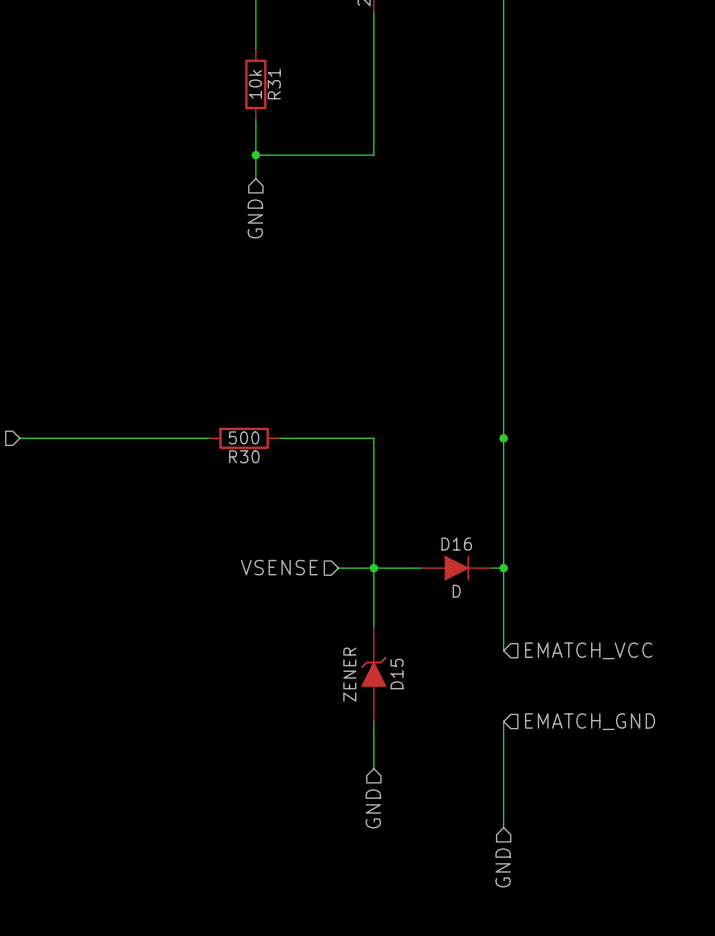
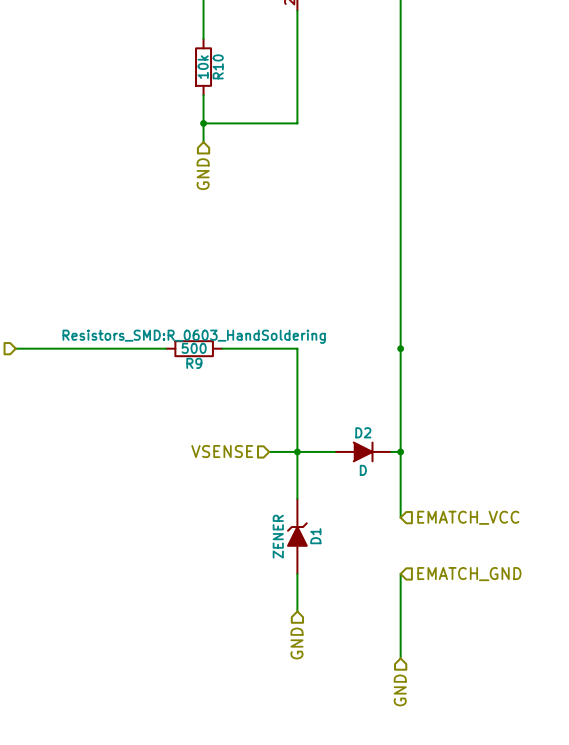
R31 name: R31 (274, 84) -> R10 (218, 66)
R30 text: none -> Resistors_SMD:R_0603_HandSoldering (194, 336)
R30 name: R30 (244, 456) -> R9 (194, 363)
D16 name: D16 (456, 544) -> D2 (363, 432)
D15 name: D15 (397, 674) -> D1 (315, 536)

